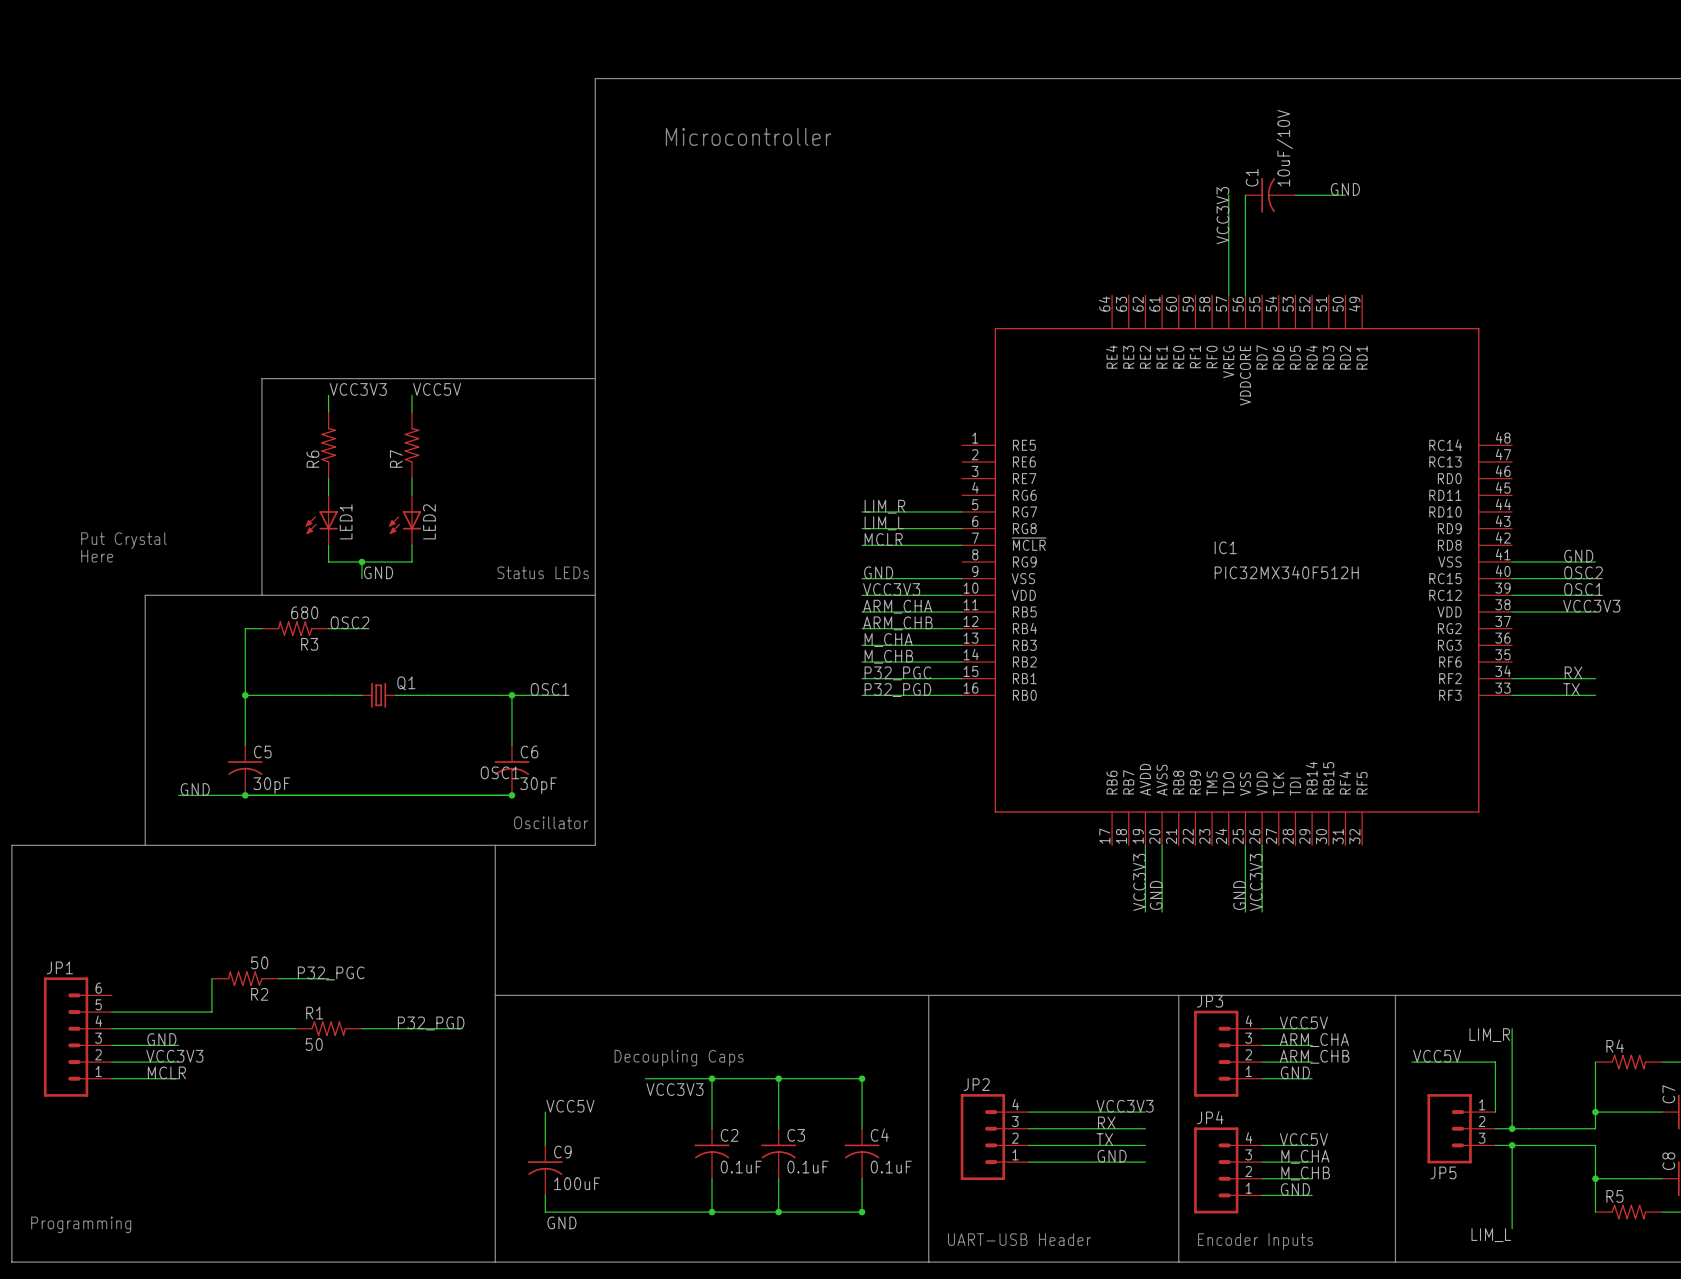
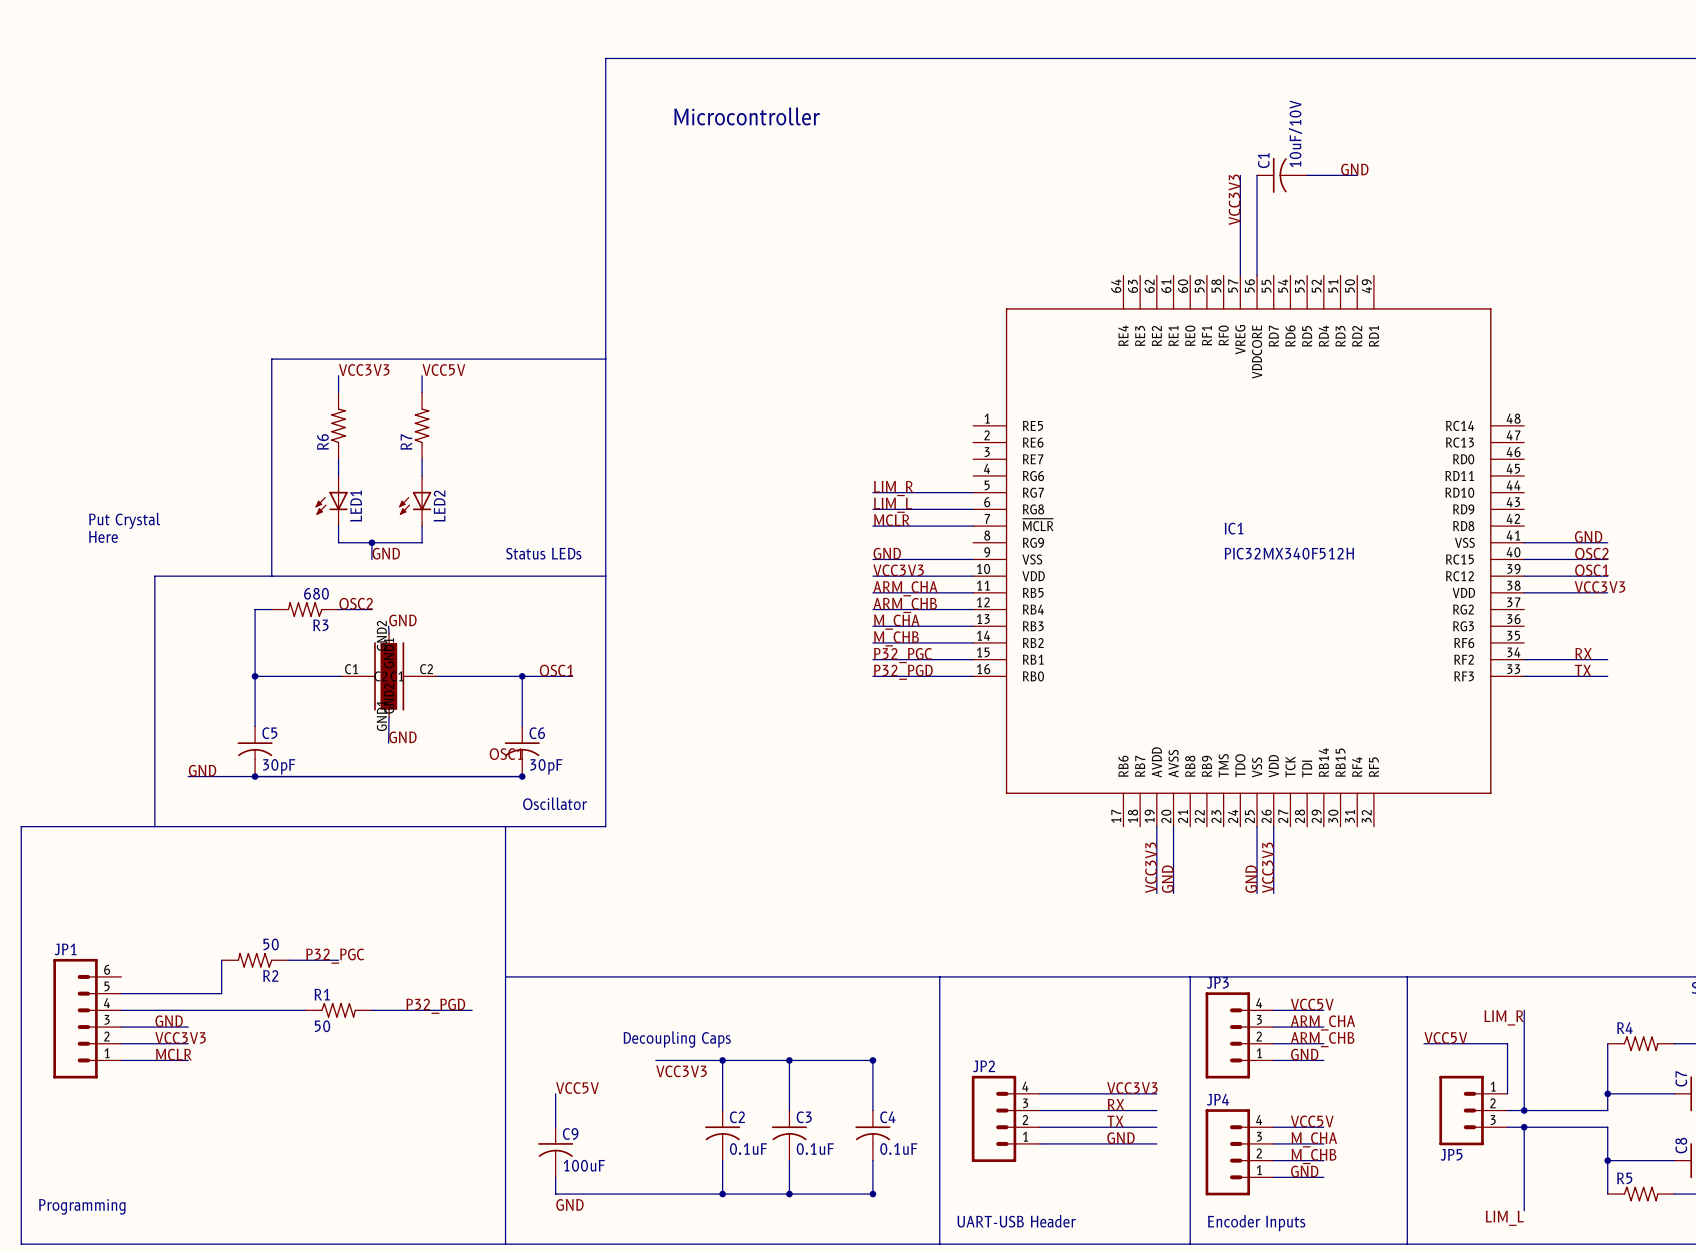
label: none -> GND (402, 620)
wire: none -> (388, 626) (389, 633)
part: none -> (389, 675)
Q1: (378, 695) -> none
wire: none -> (389, 717) (388, 743)
label: none -> GND (402, 737)

